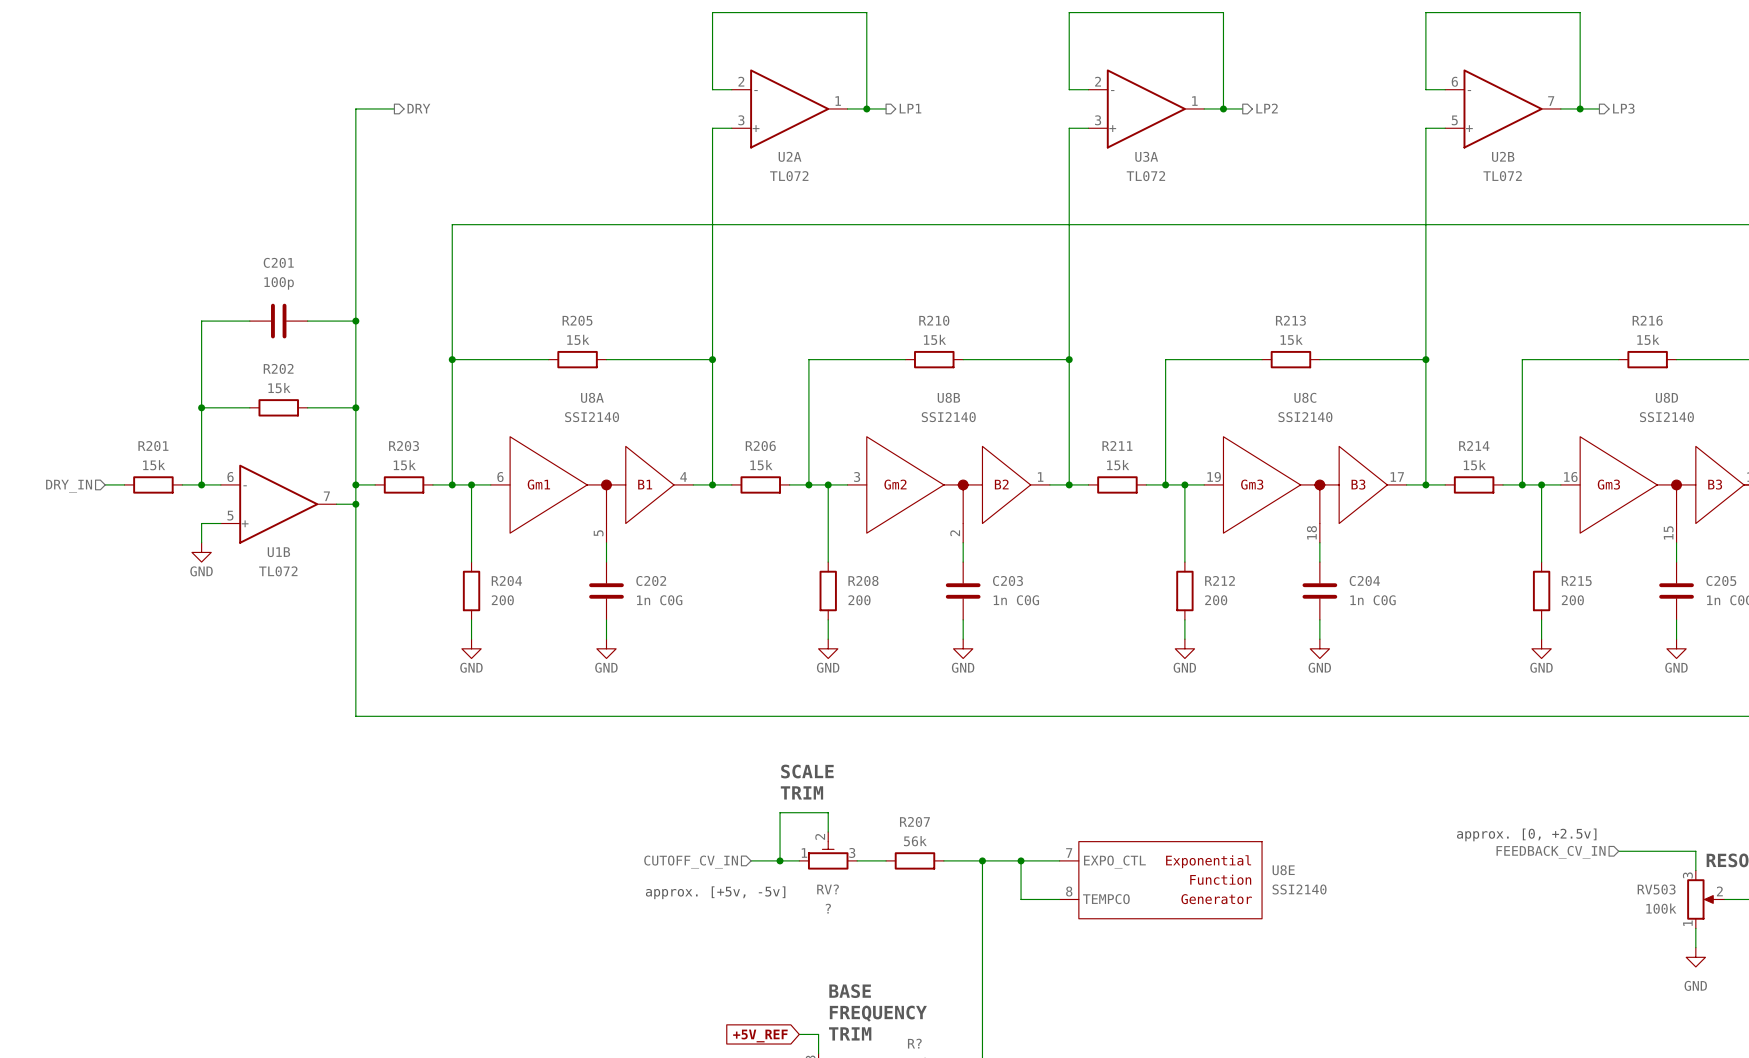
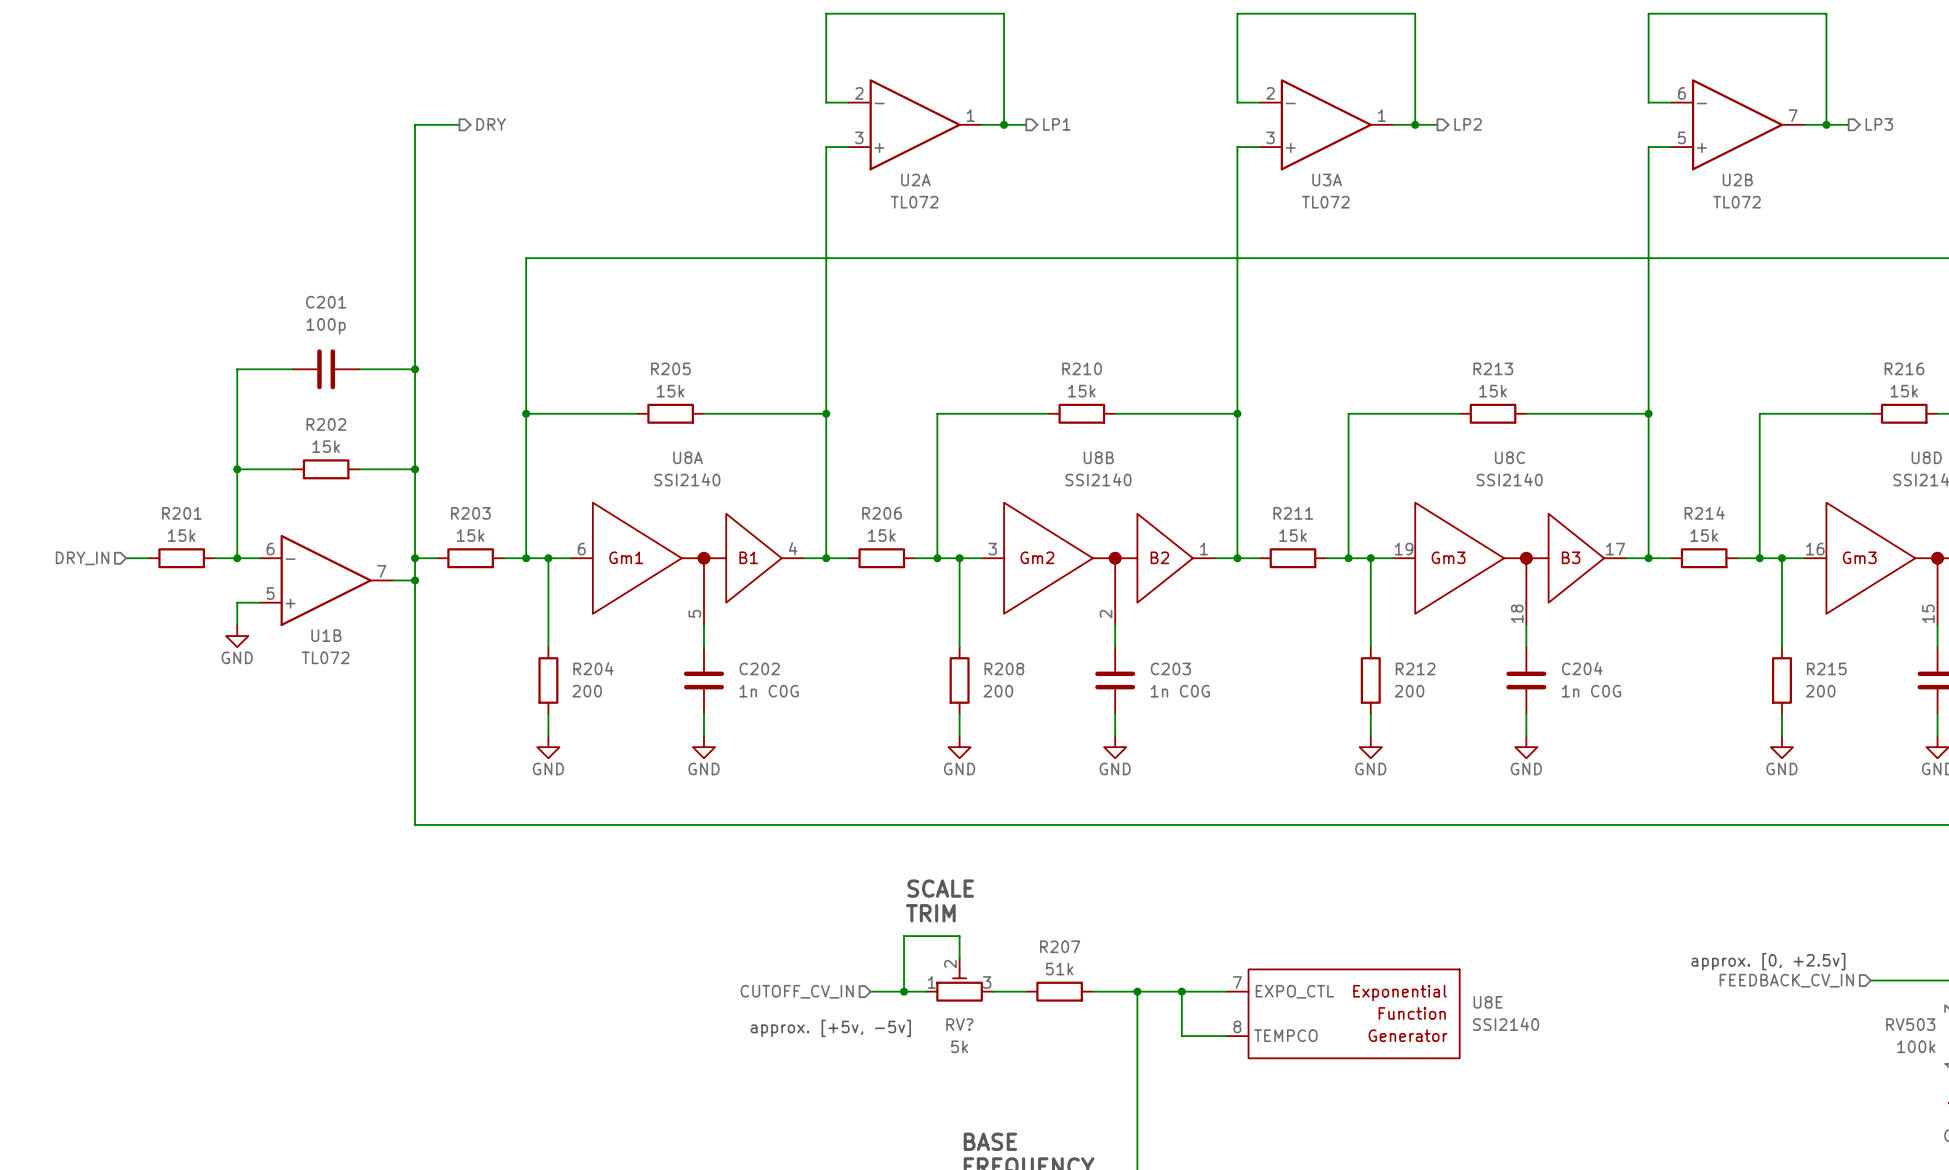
R207 value: 56k (915, 841) -> 51k (1059, 969)
RV? value: ? (828, 908) -> 5k (959, 1046)

